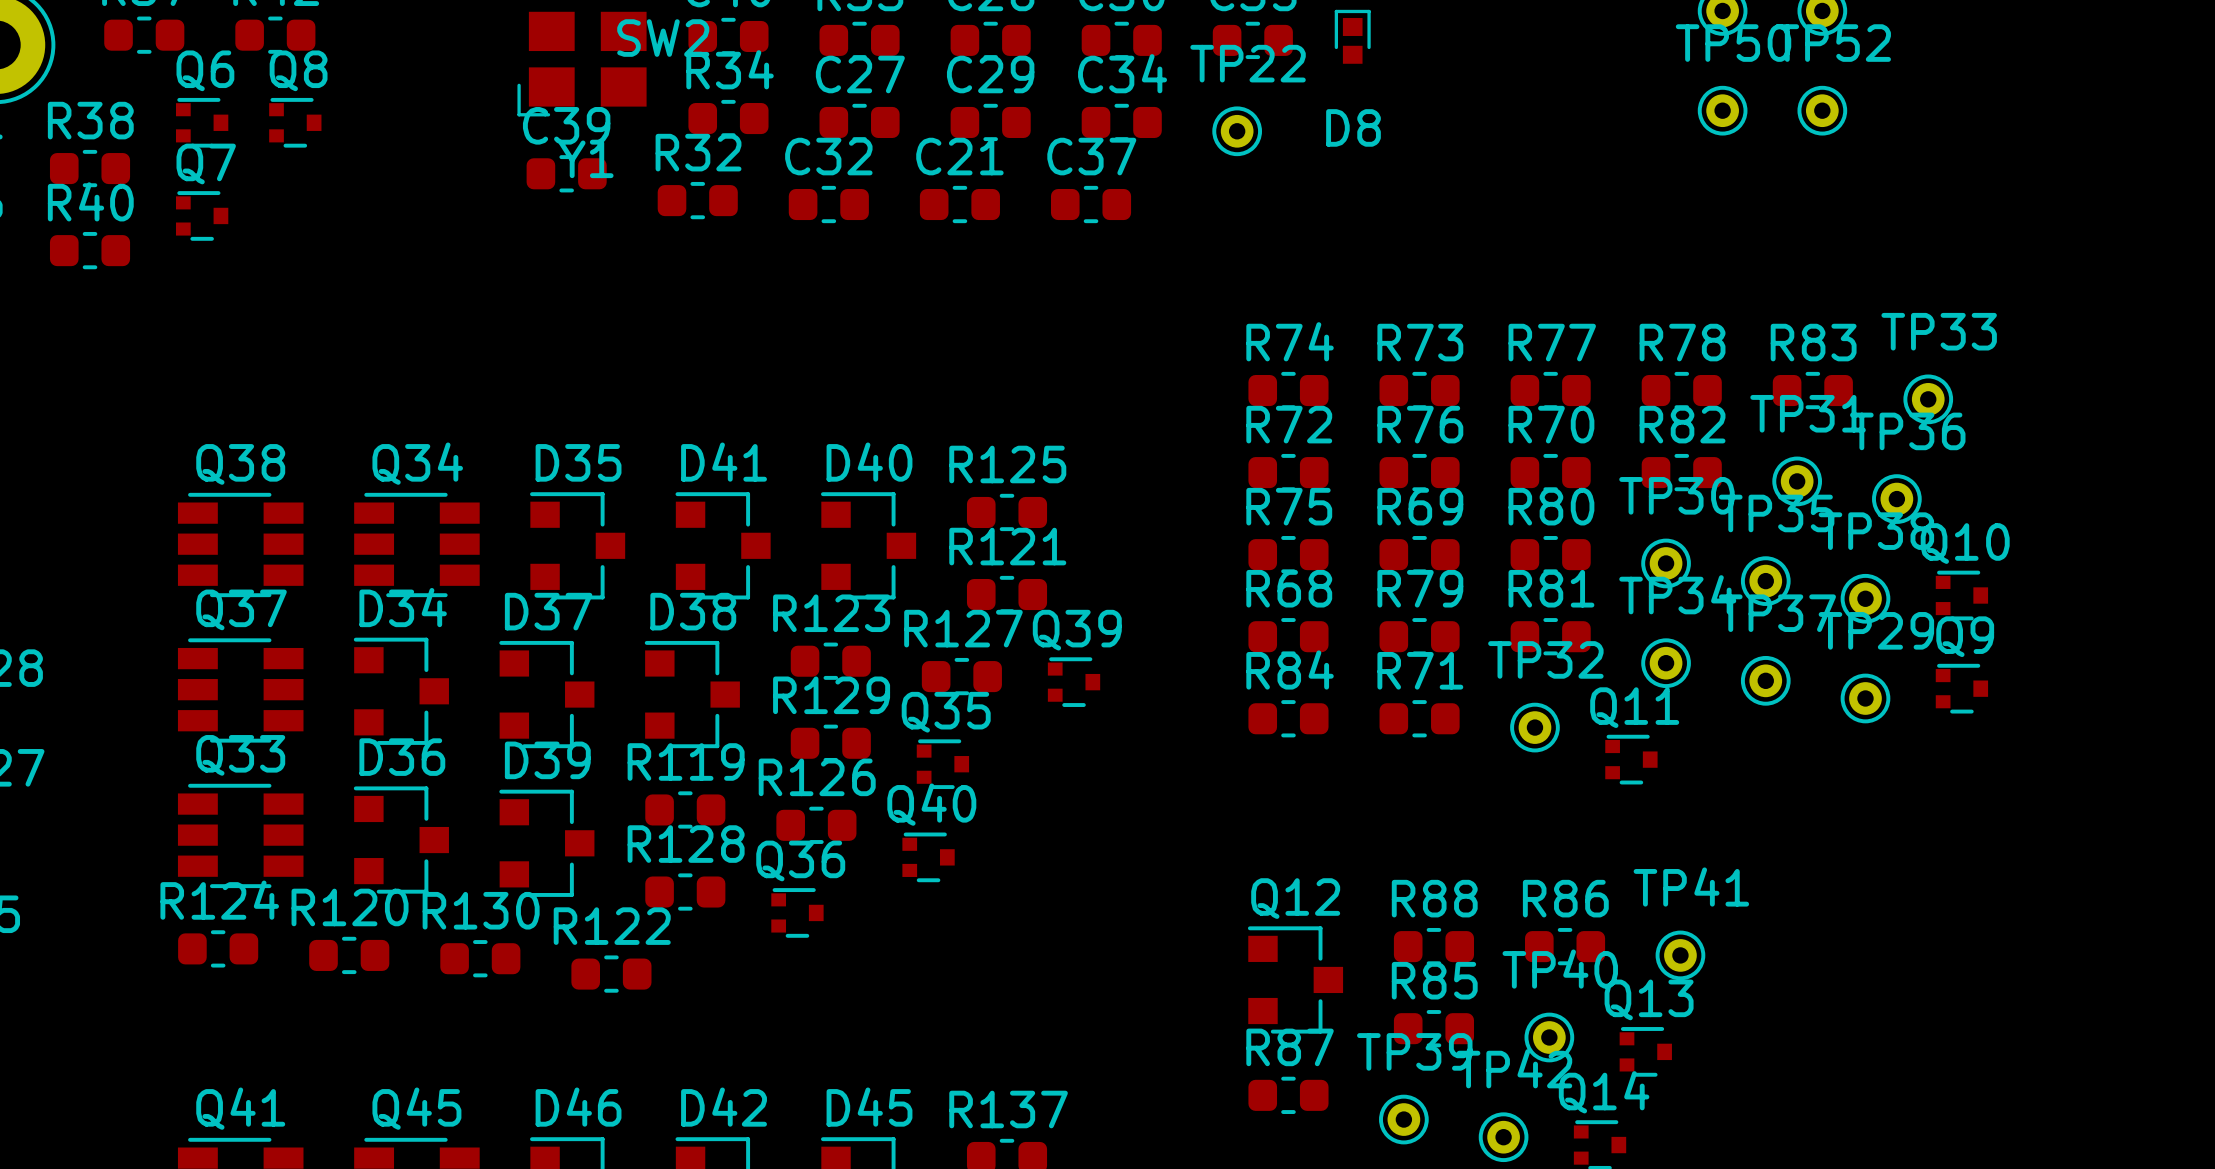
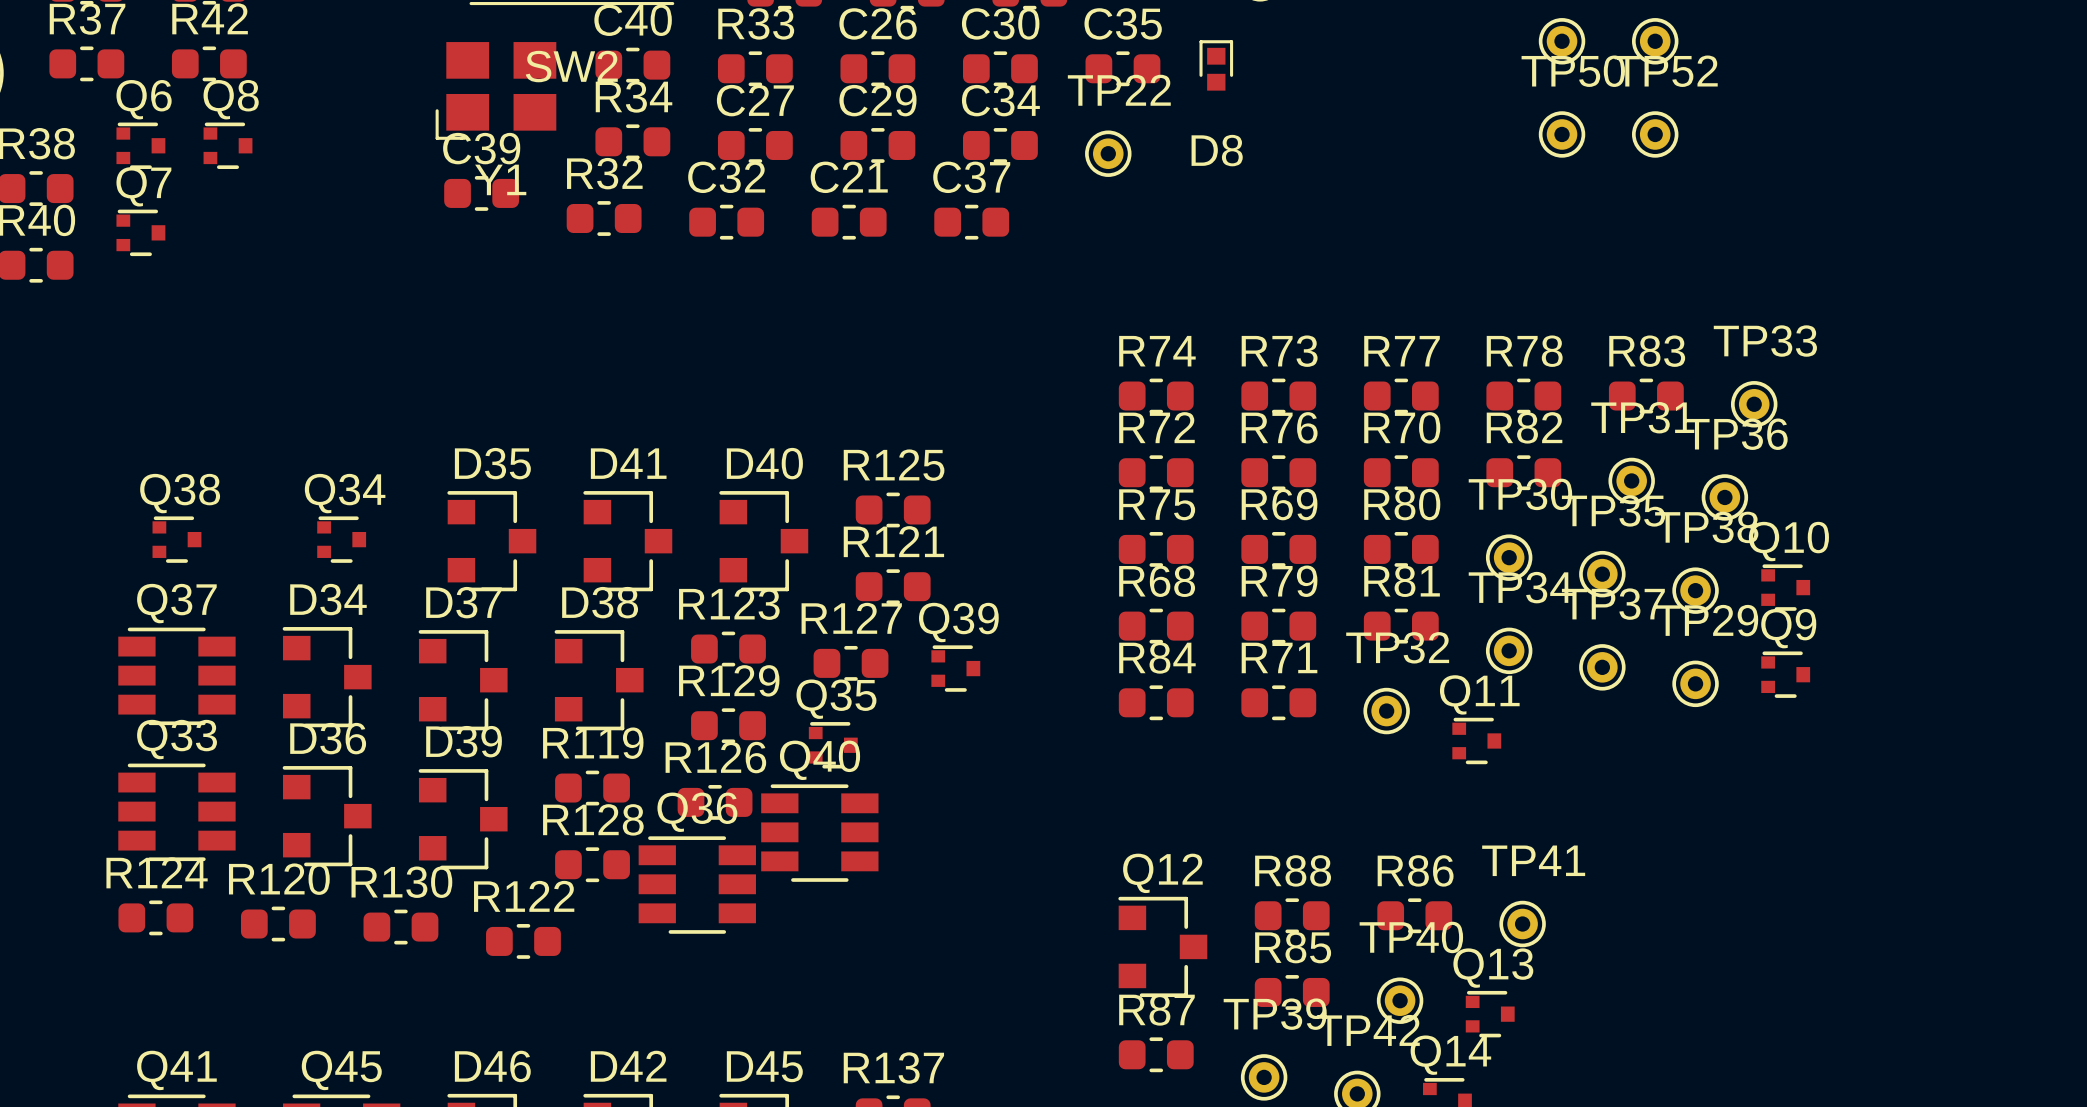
Q38 footprint: [177, 492, 304, 598] -> [152, 516, 202, 563]
Q34 footprint: [354, 492, 480, 598] -> [317, 516, 367, 563]
Q40 footprint: [902, 832, 955, 883] -> [761, 784, 879, 882]
Q36 footprint: [771, 888, 824, 938] -> [638, 836, 756, 934]

